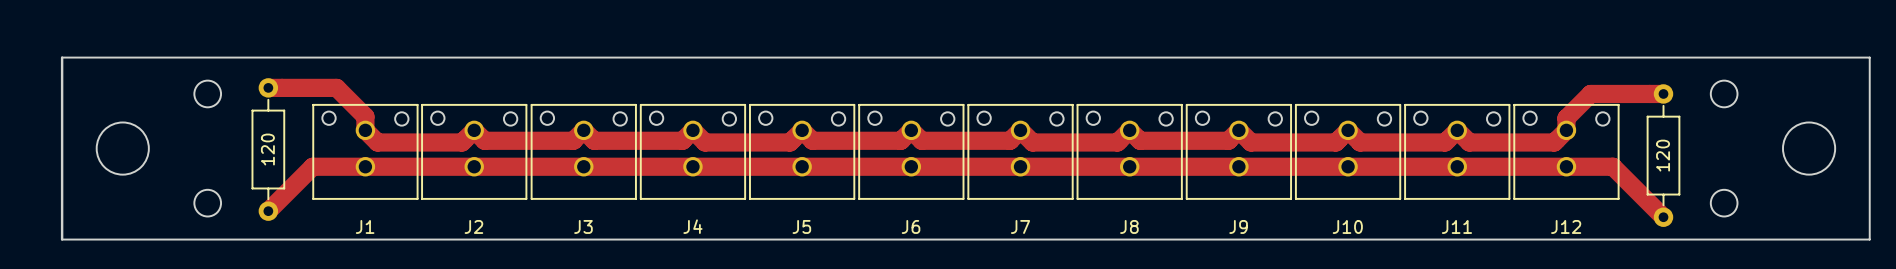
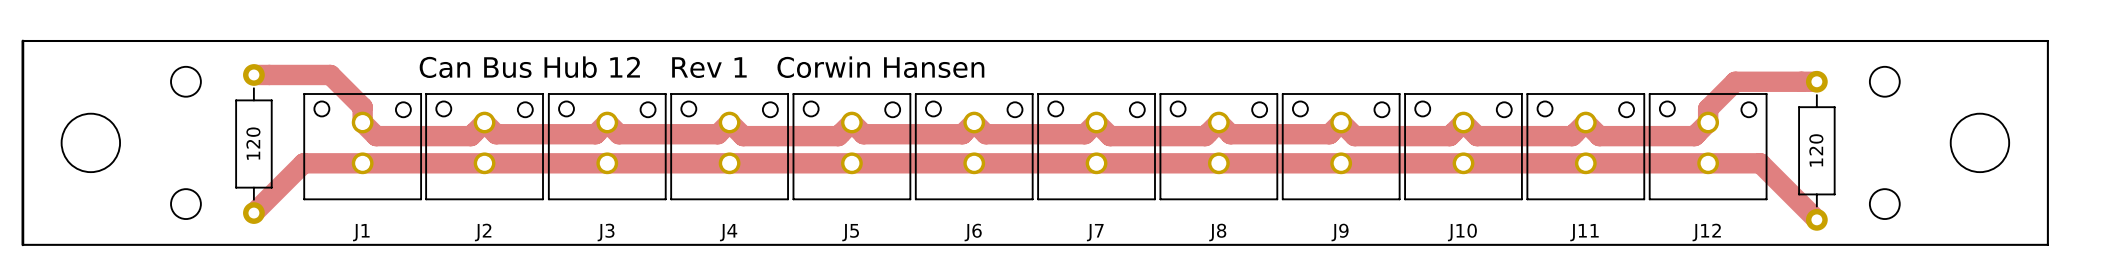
text: none -> Can Bus Hub 12 Rev 1 Corwin Hansen (702, 67)

